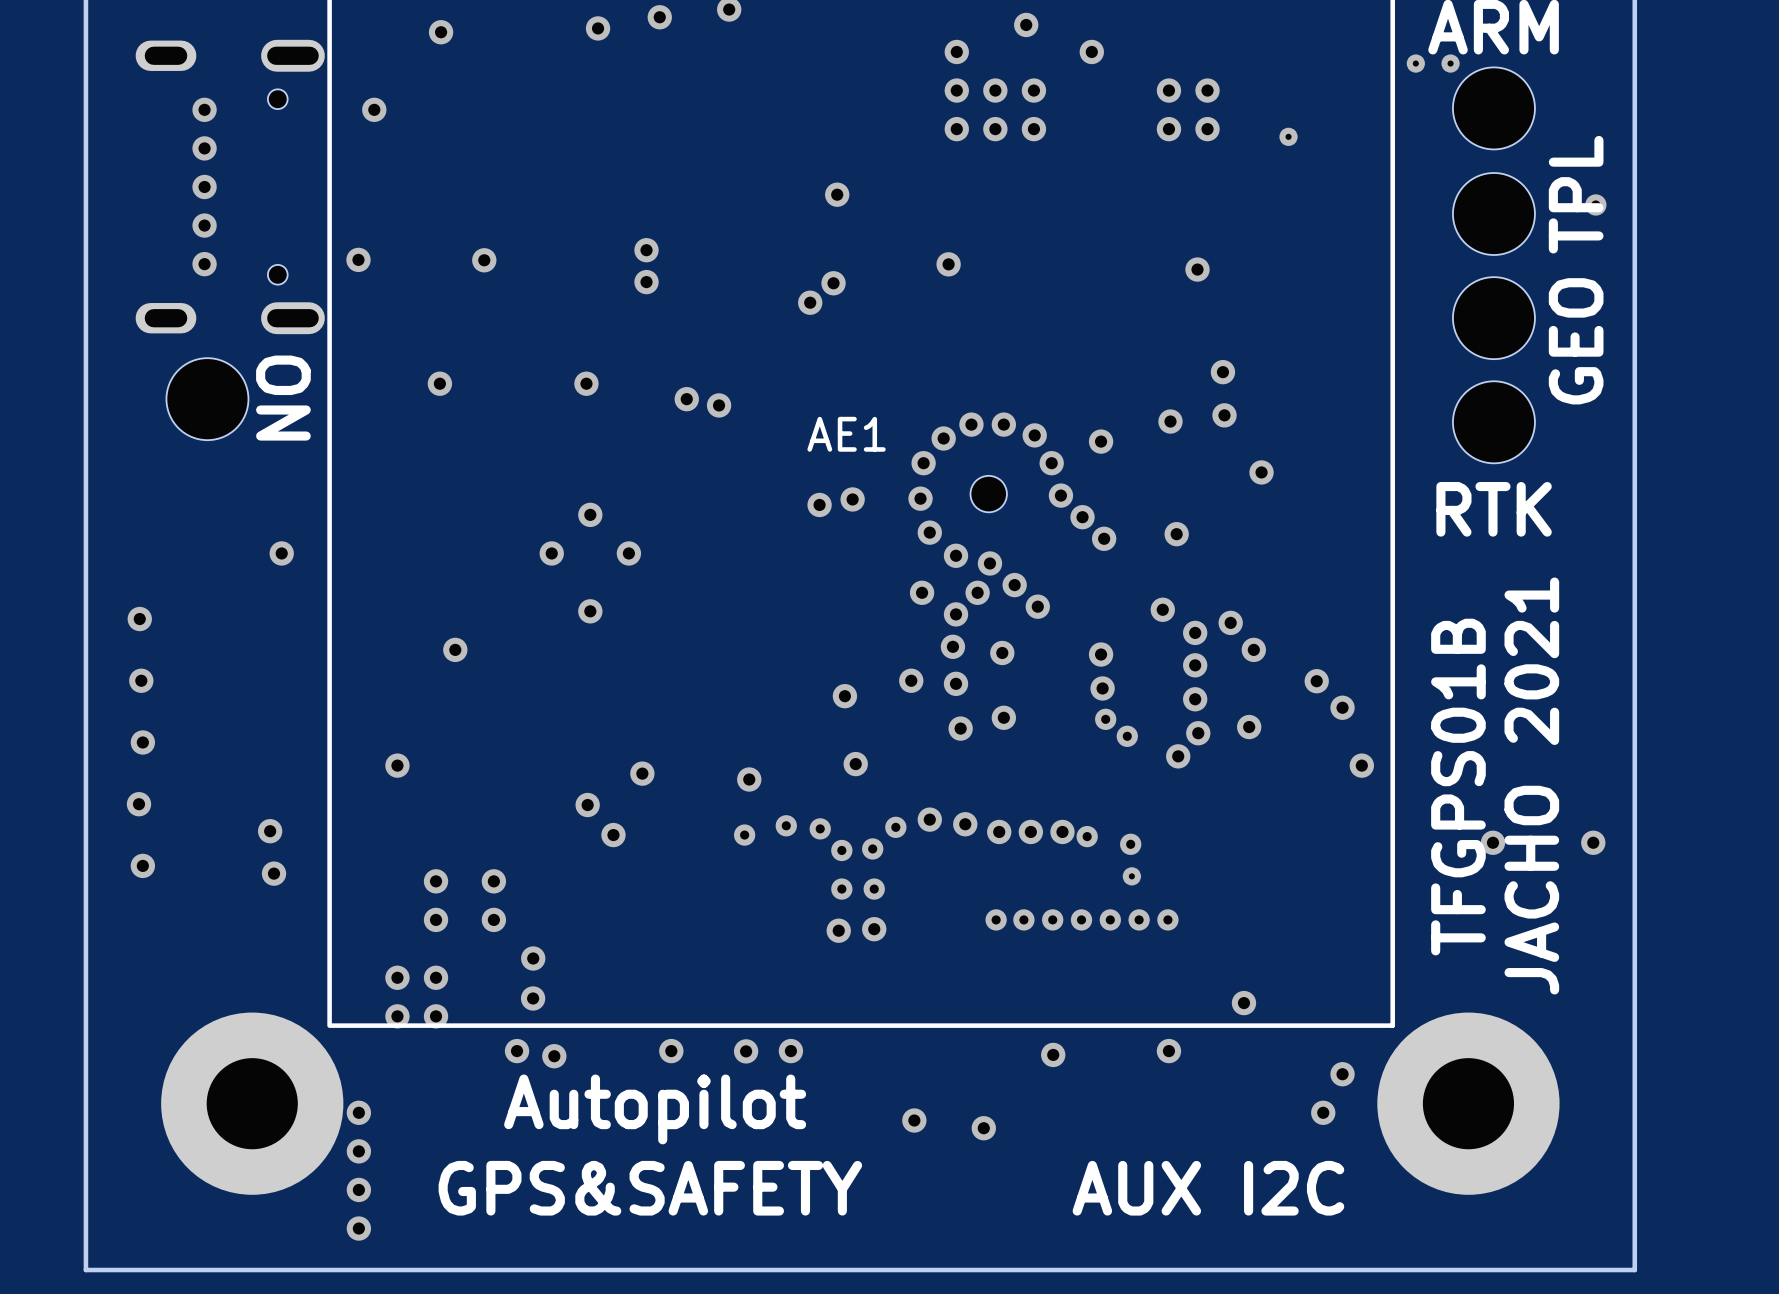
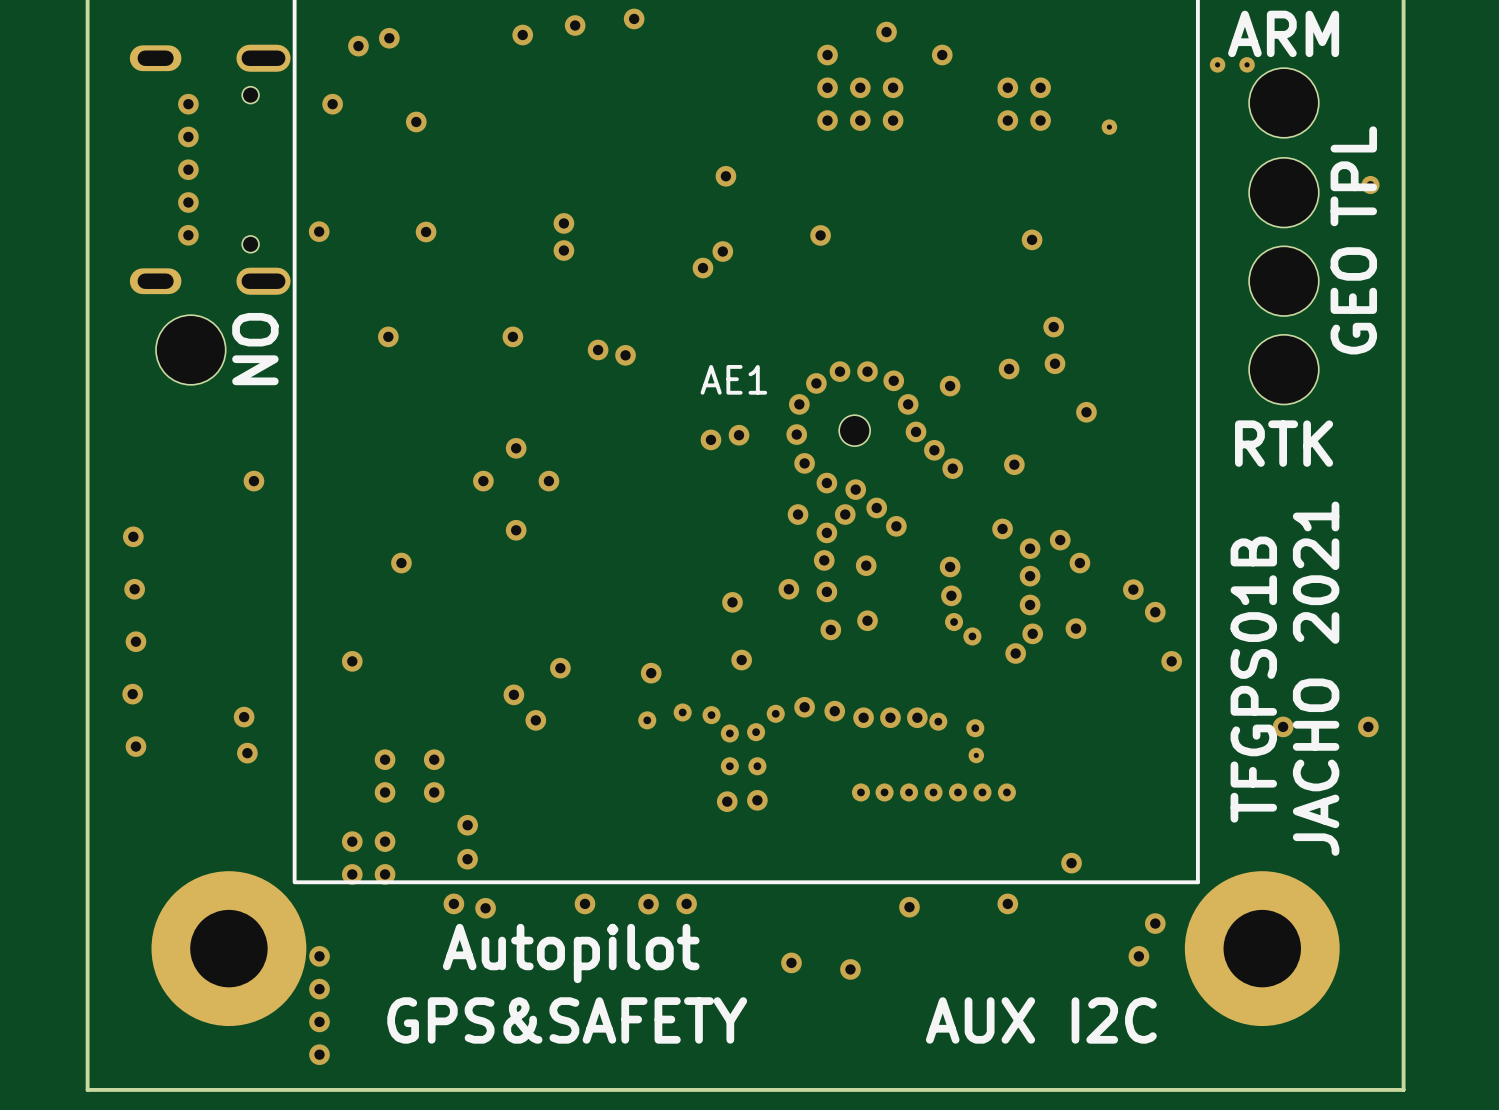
via: none -> (358, 46)
via: none -> (416, 121)

